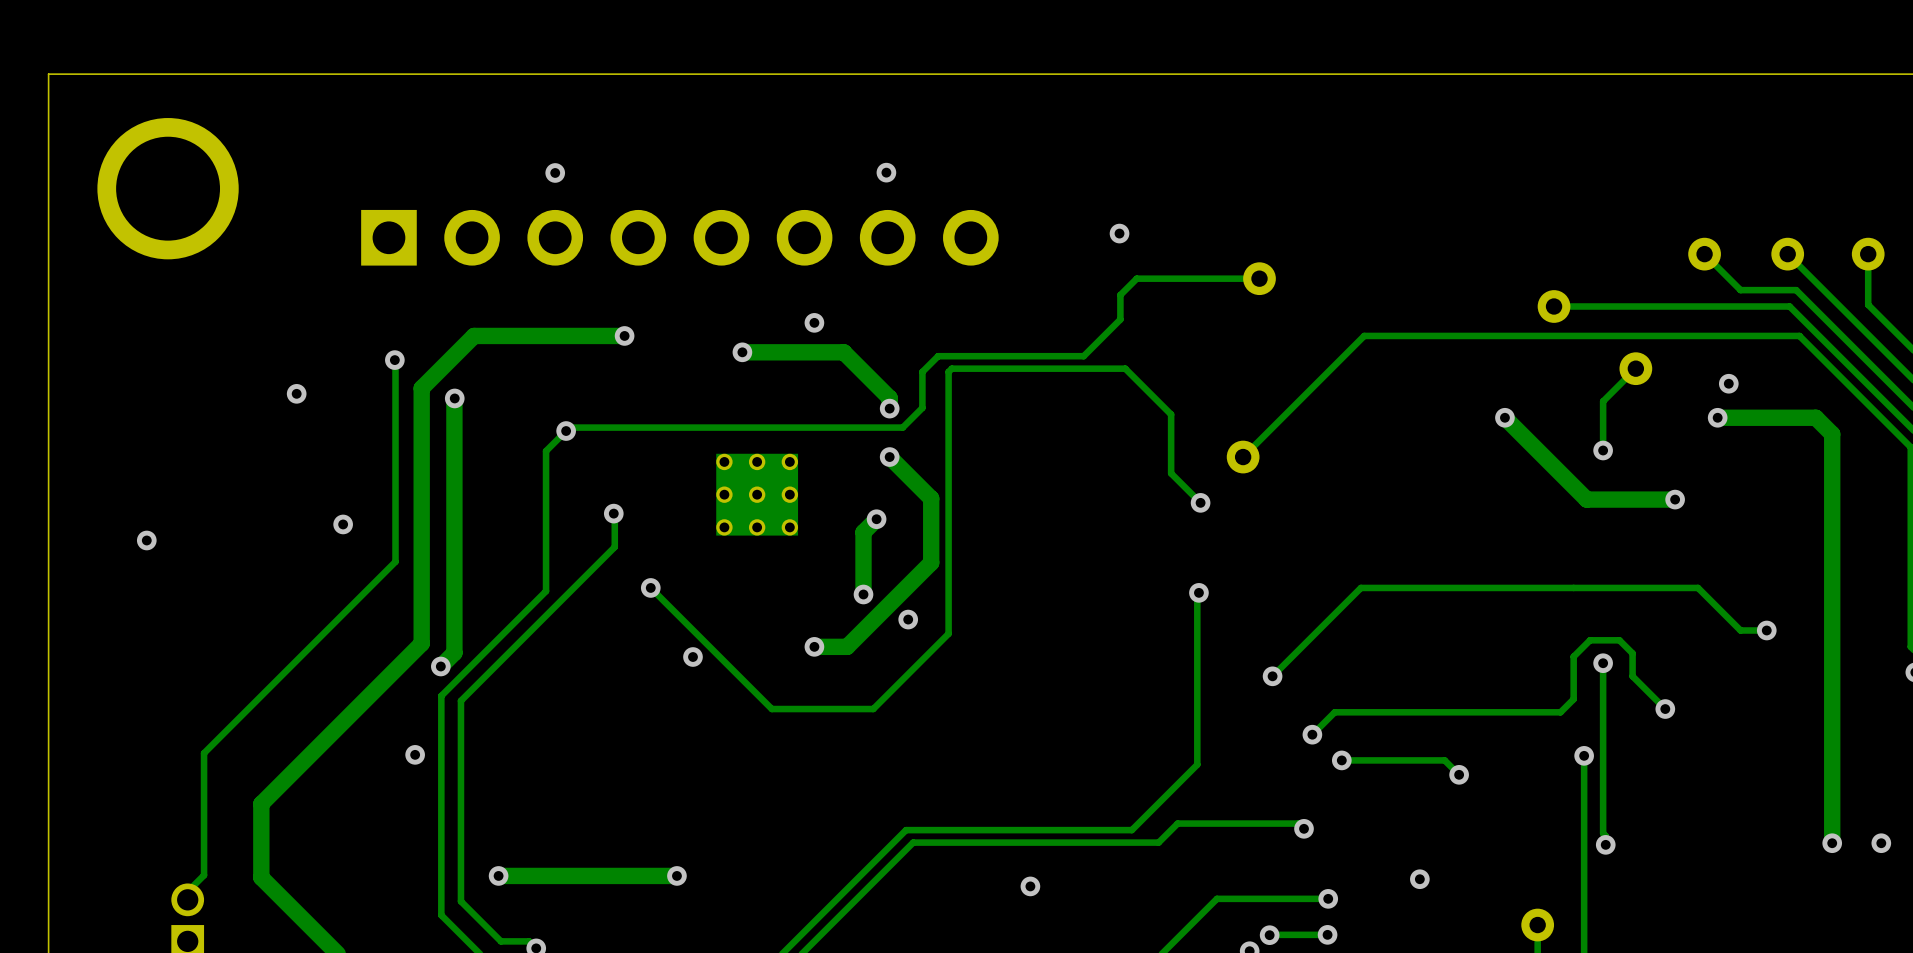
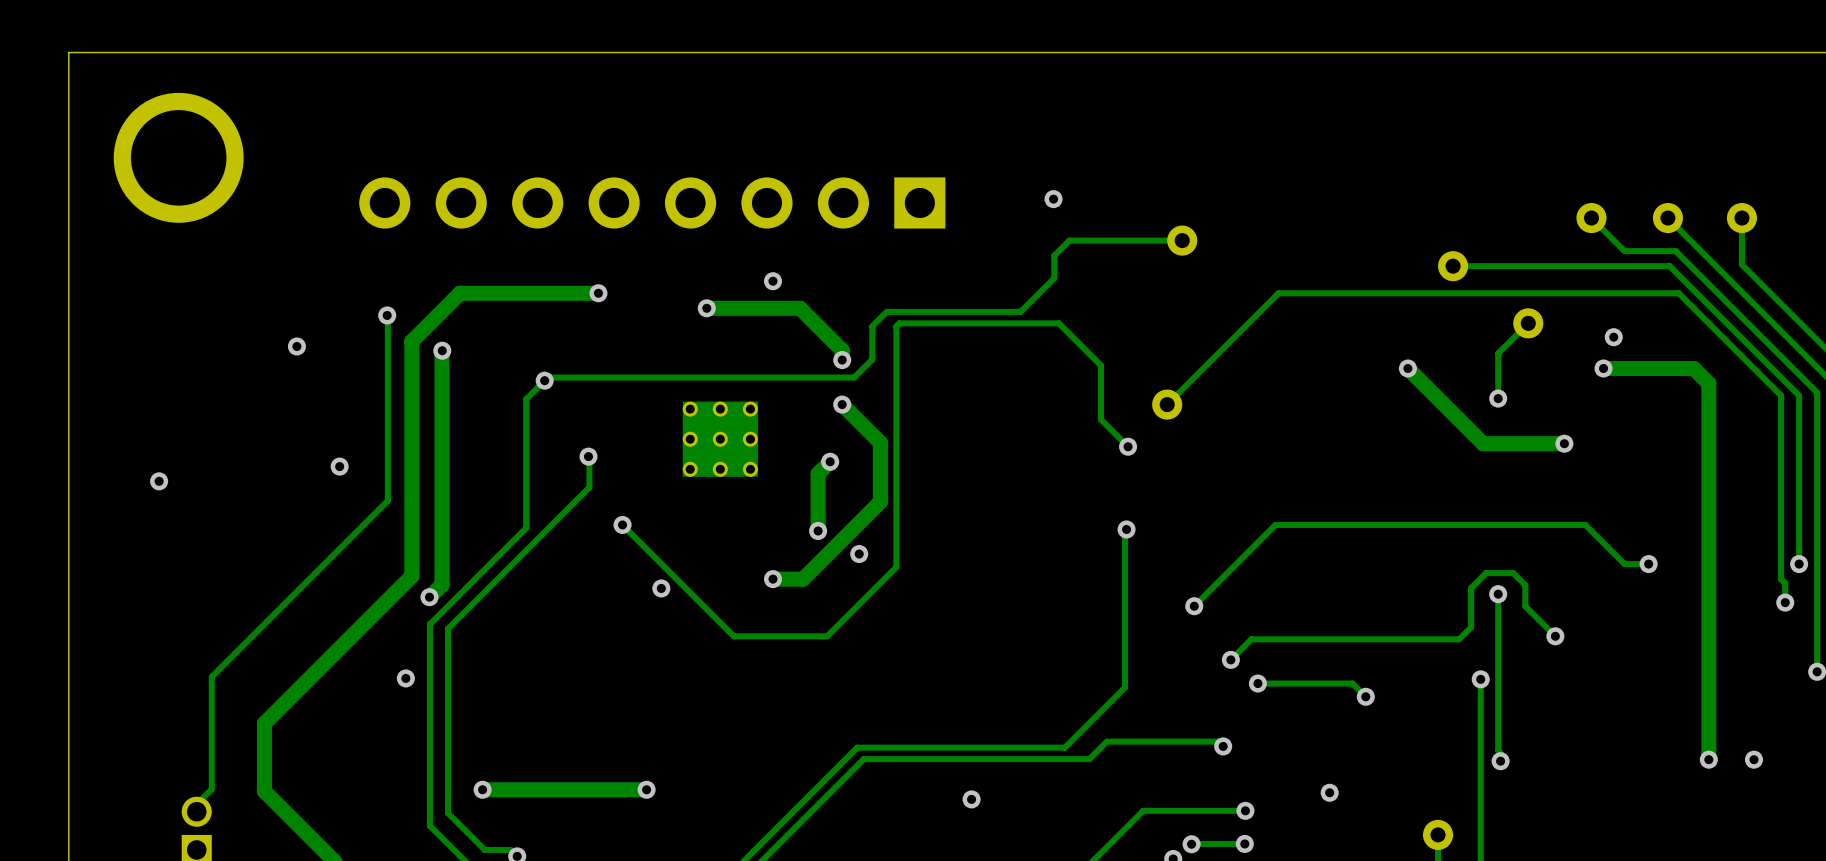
via: (555, 172) -> none
via: (886, 172) -> none
part rotation: 0° (679, 237) -> 180° (652, 202)

